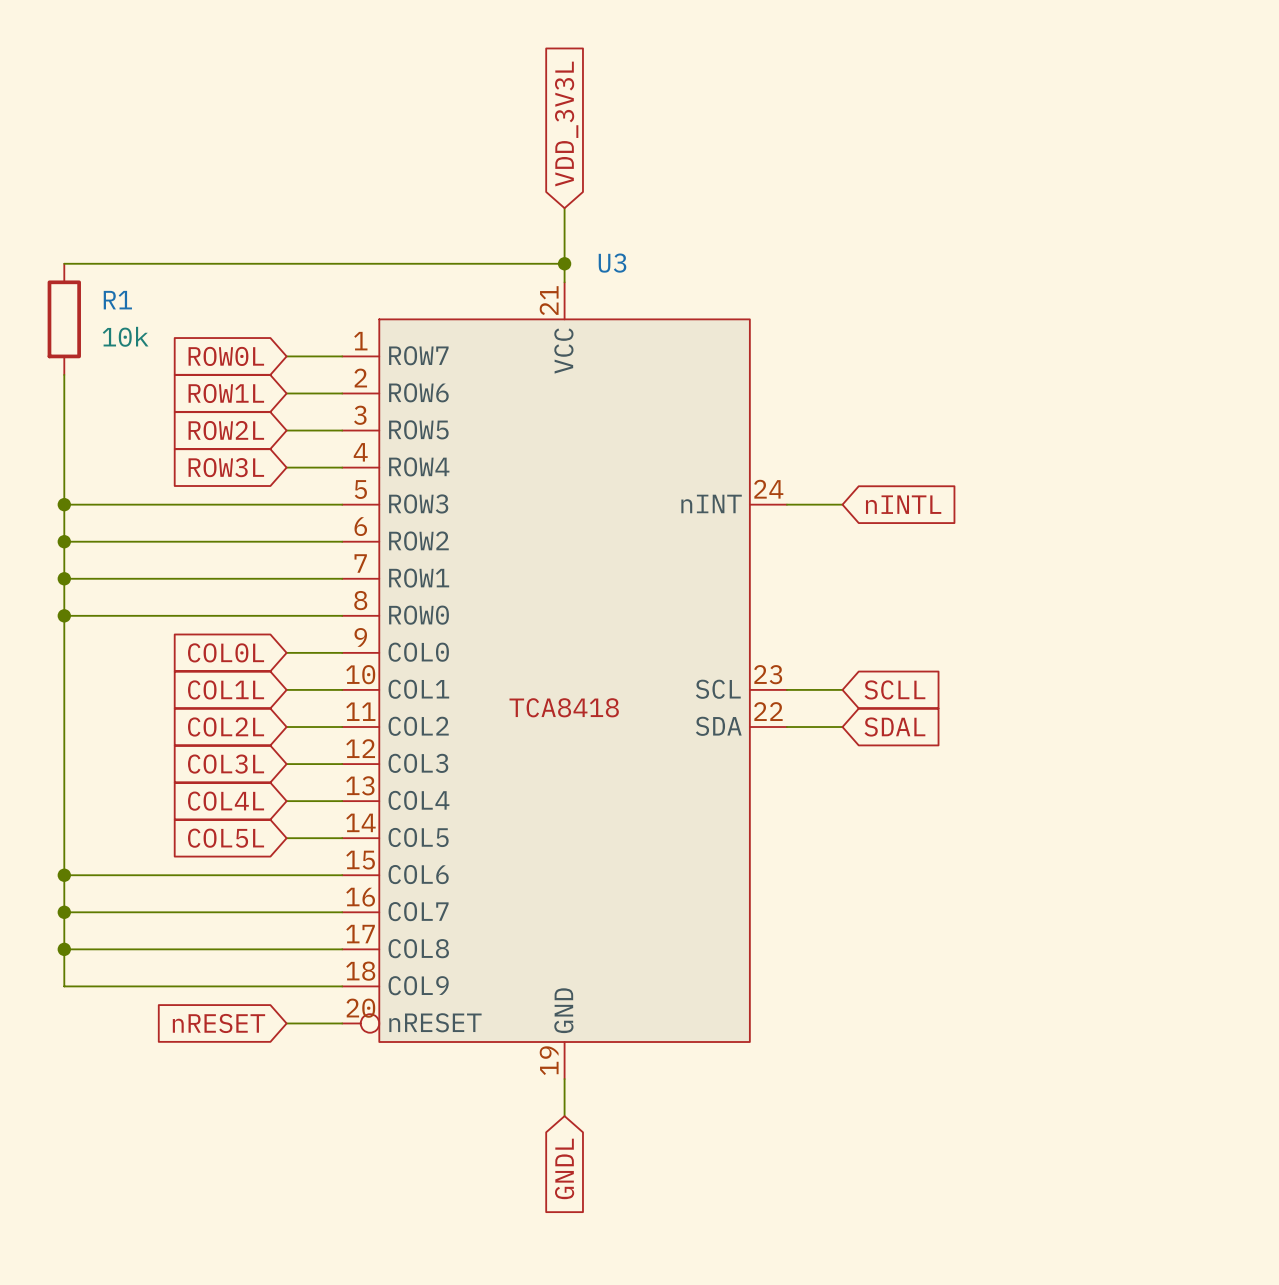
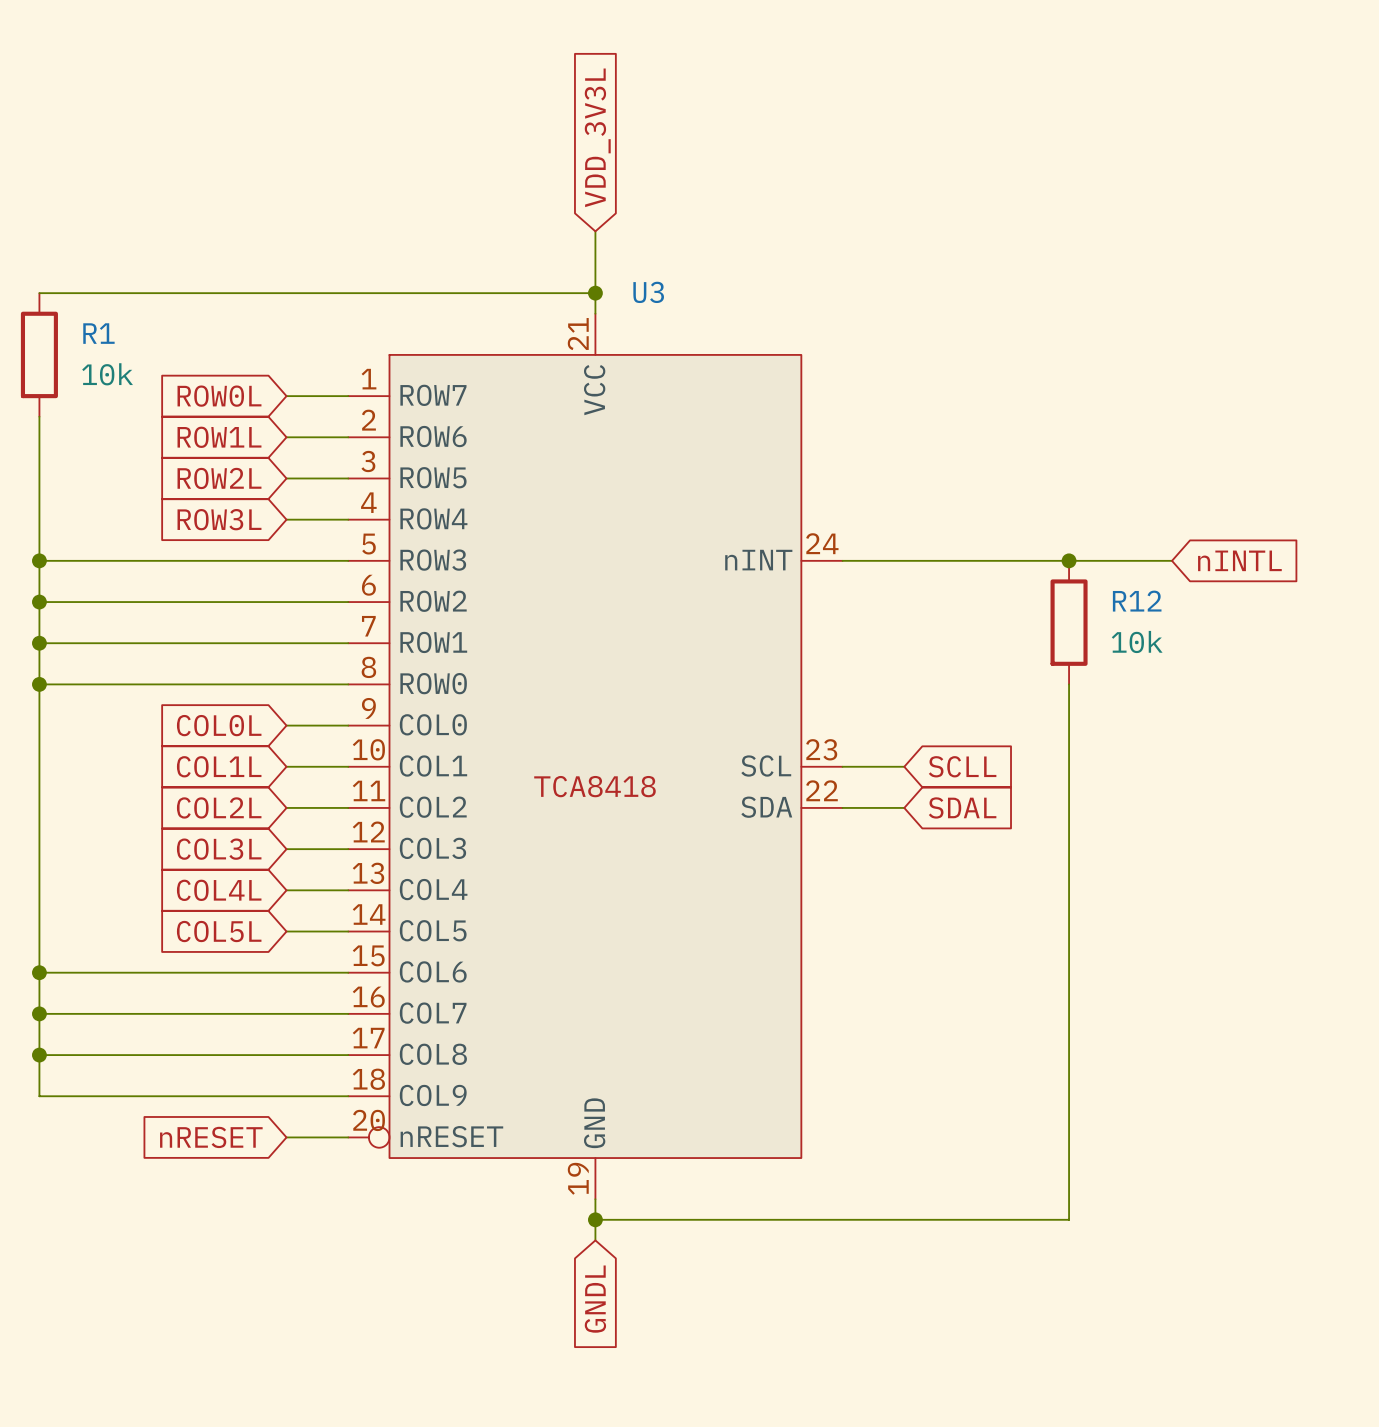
wire: none -> (904, 560) (1172, 560)
global label position: nINTL (903, 504) -> nINTL (1239, 560)
junction: none -> (1069, 560)
R12: none -> 10k (1069, 622)
wire: none -> (1069, 684) (1069, 1219) (595, 1219)
junction: none -> (595, 1219)

